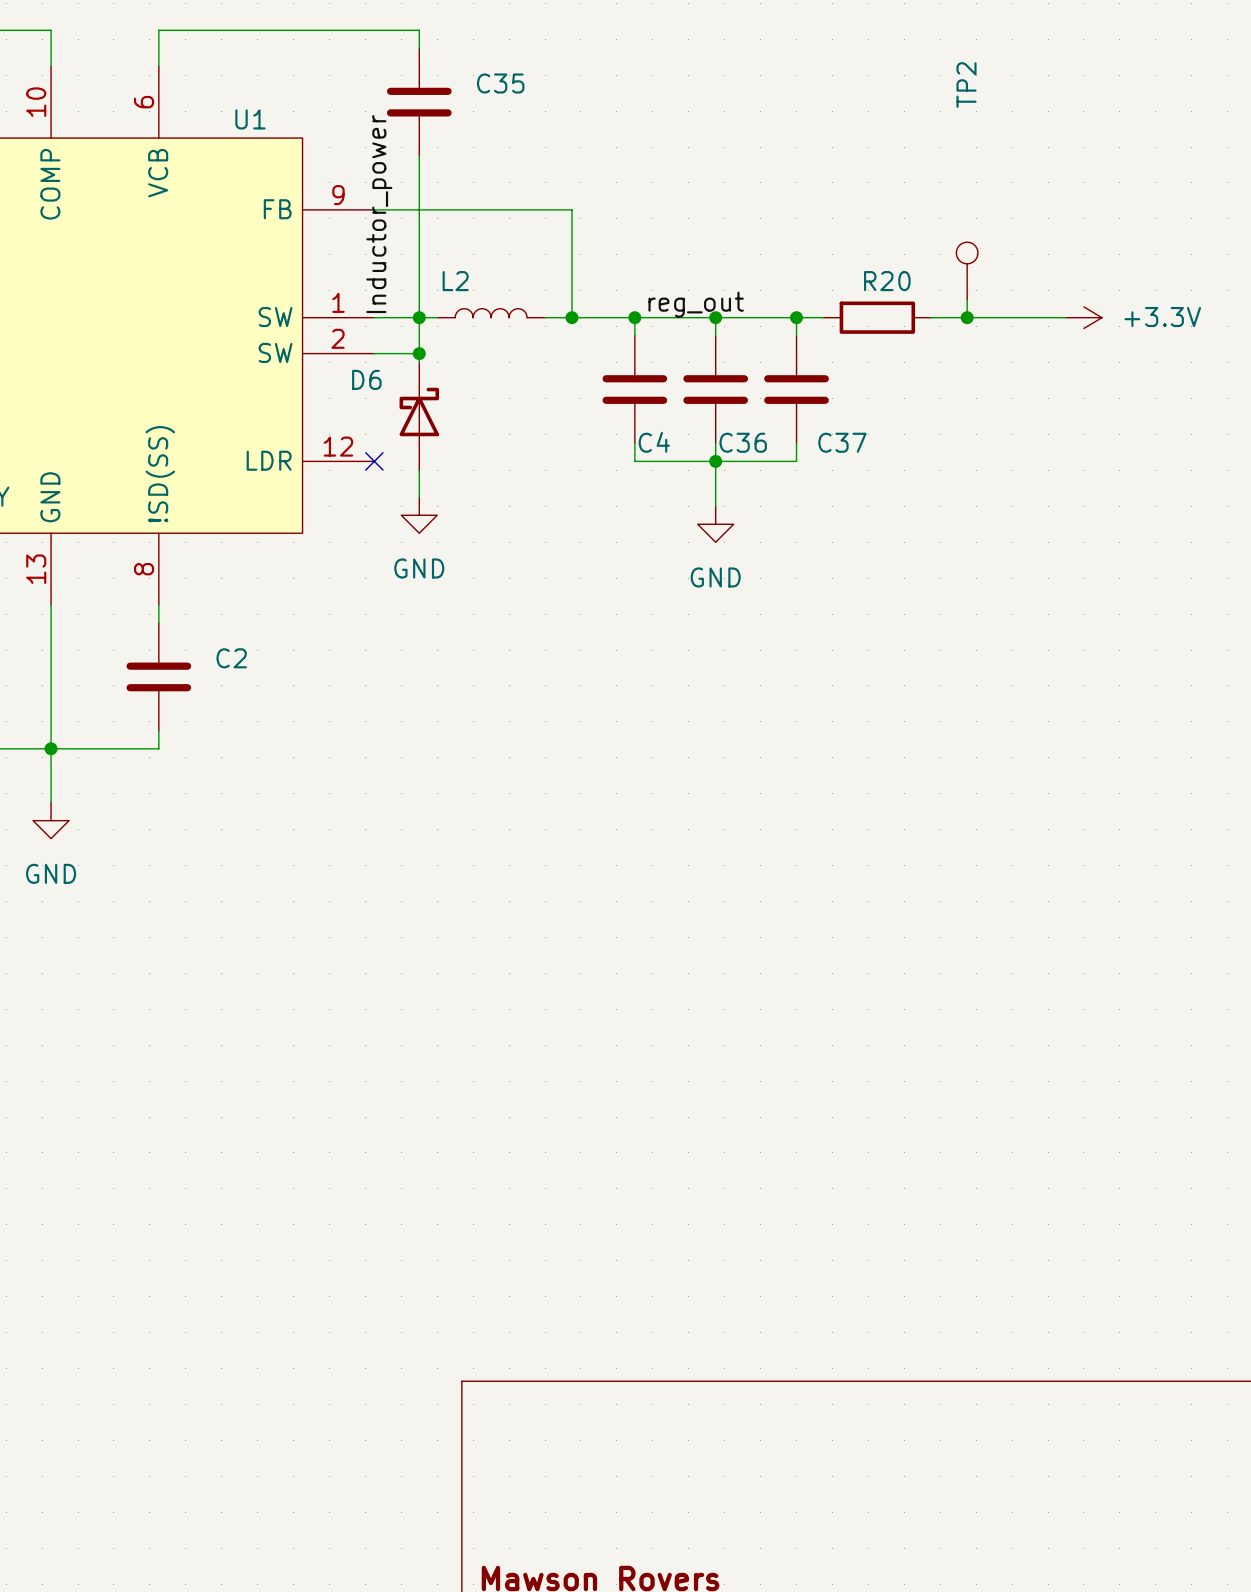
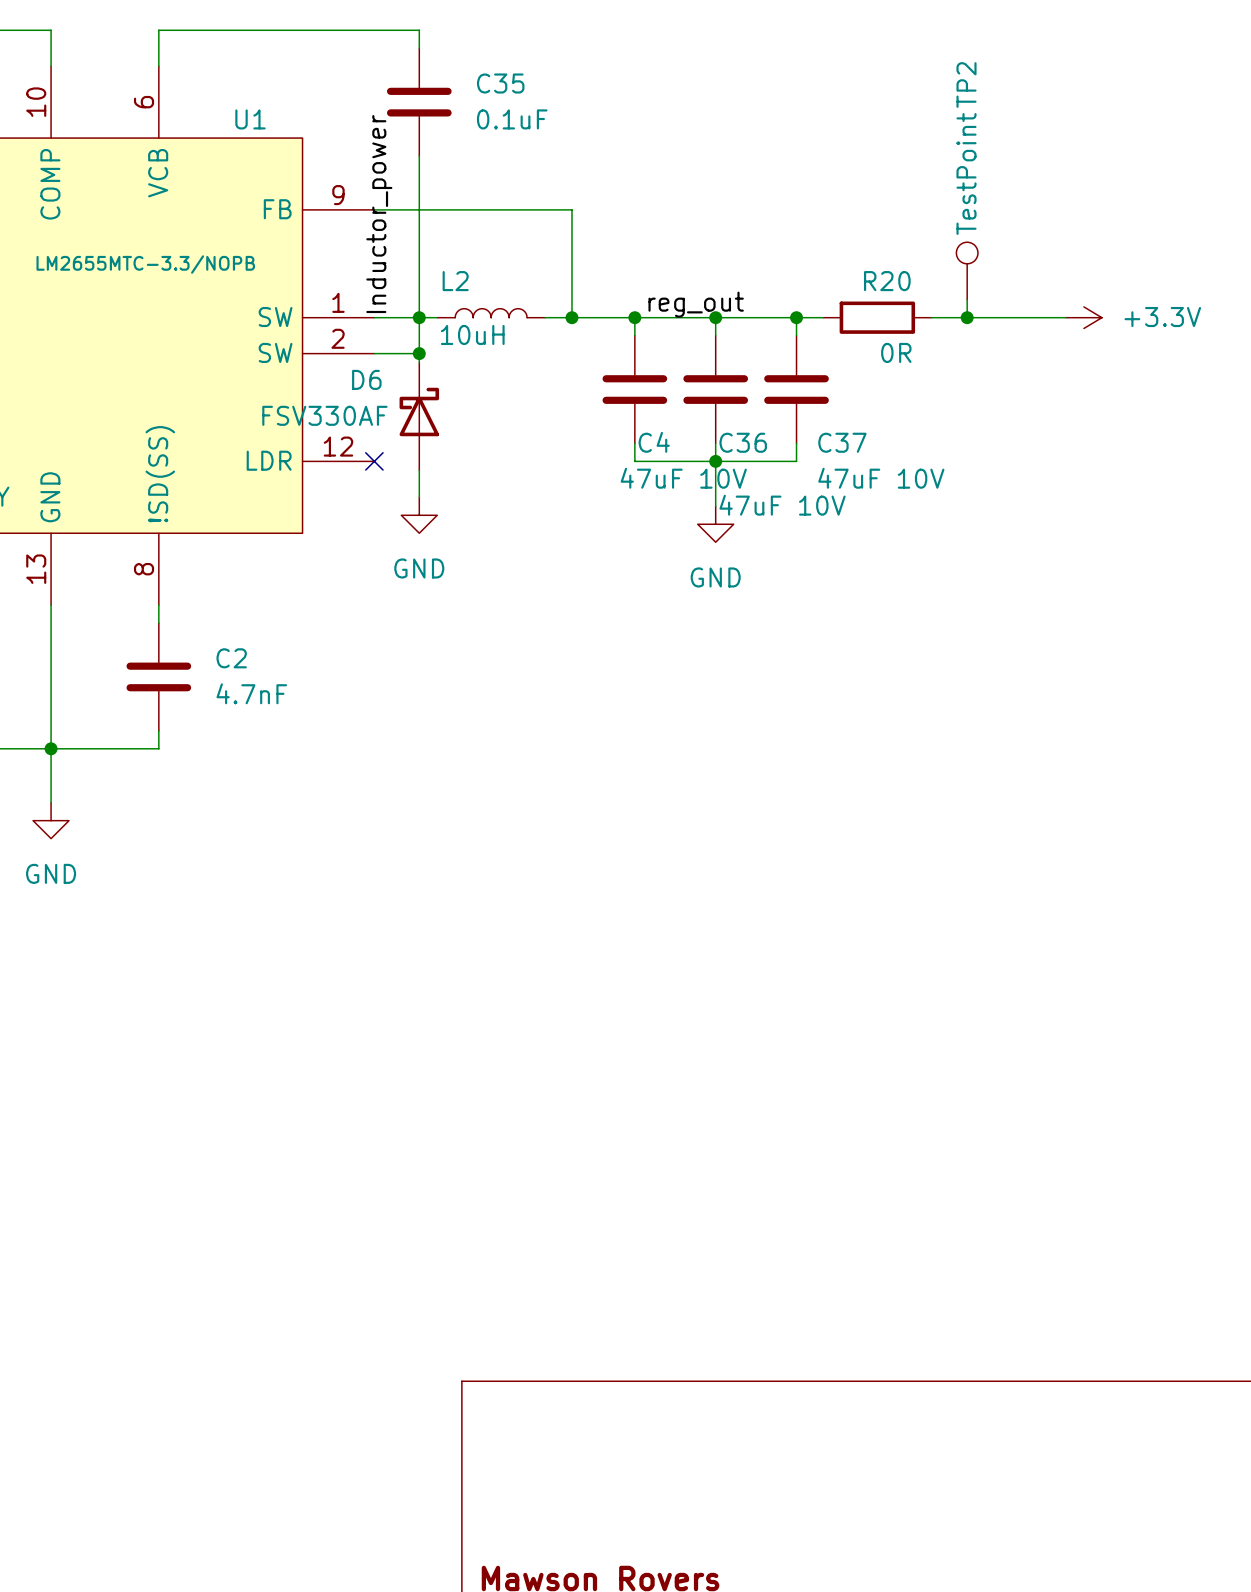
C35 value: none -> 0.1uF (512, 119)
TP2 value: none -> TestPoint (966, 173)
U1 value: none -> LM2655MTC-3.3/NOPB (145, 264)
L2 value: none -> 10uH (472, 334)
R20 value: none -> 0R (896, 352)
D6 value: none -> FSV330AF (324, 415)
C4 value: none -> 47uF 10V (683, 478)
C37 value: none -> 47uF 10V (881, 478)
C36 value: none -> 47uF 10V (782, 505)
C2 value: none -> 4.7nF (251, 693)

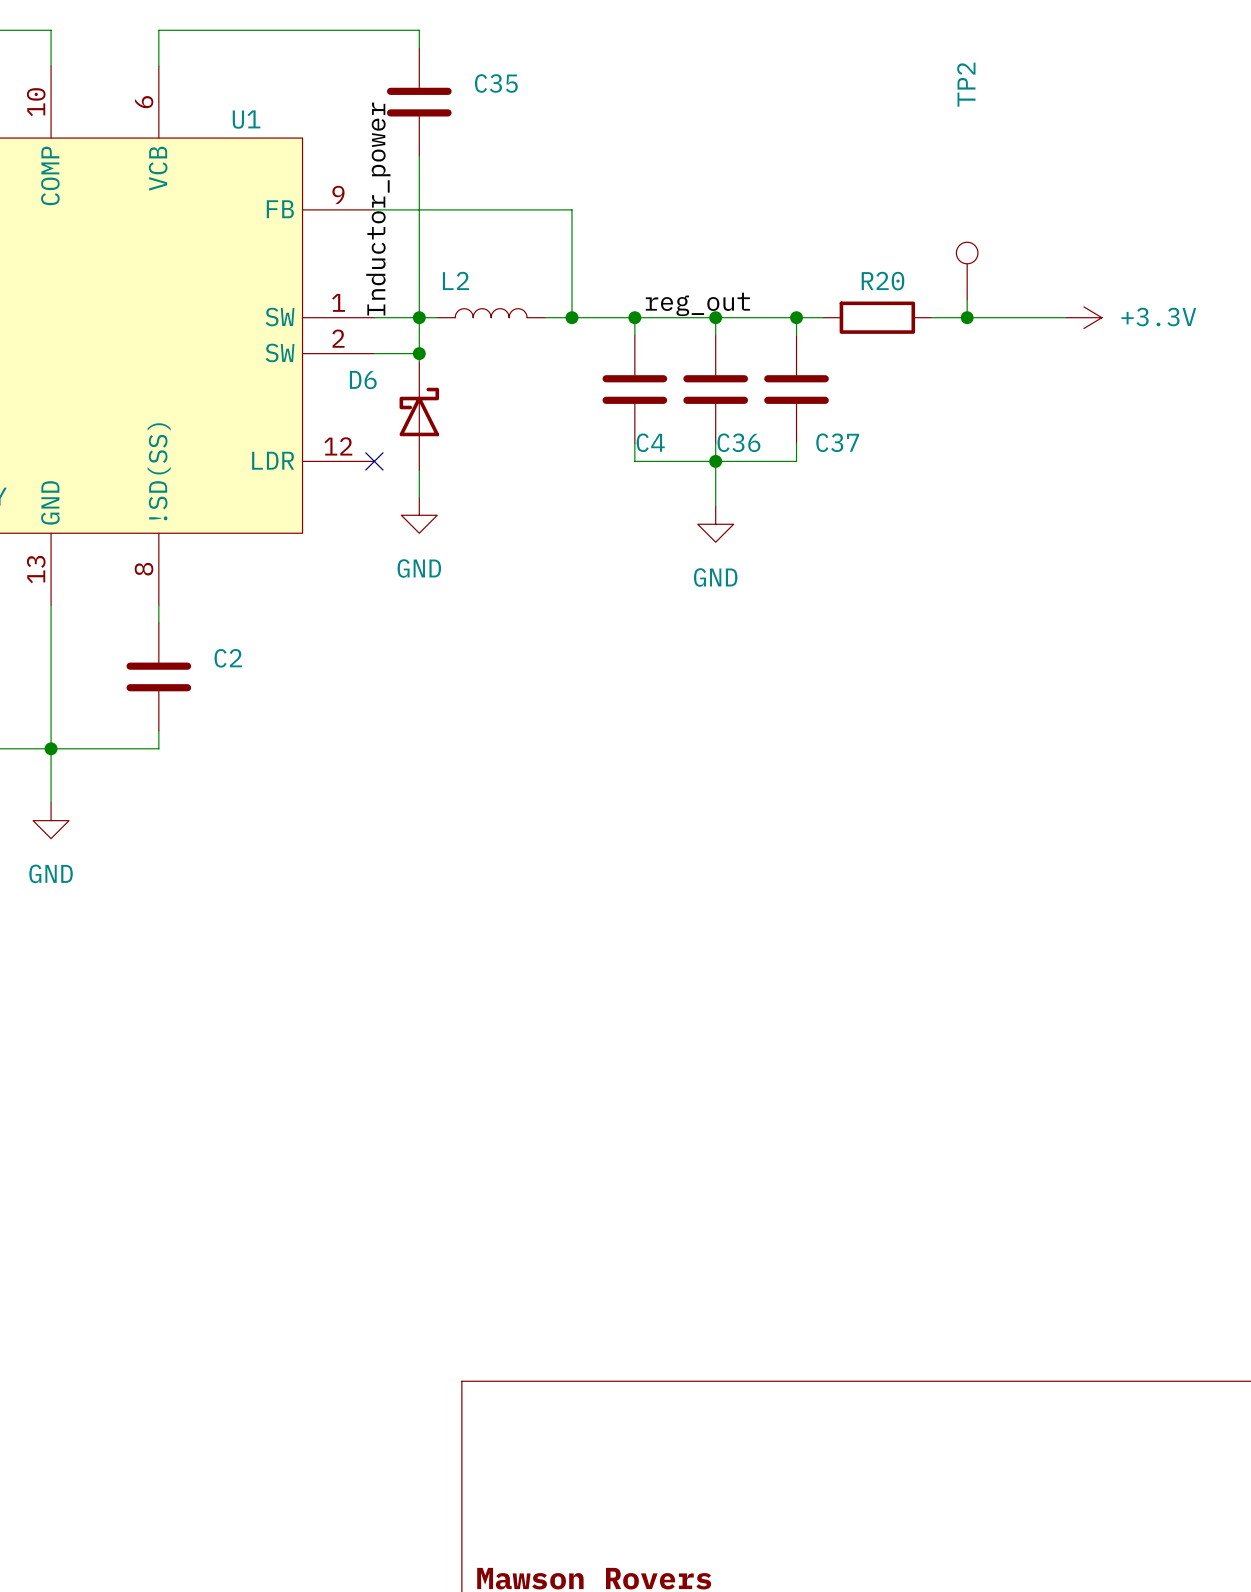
C35 value: 0.1uF (512, 119) -> none
TP2 value: TestPoint (966, 173) -> none
U1 value: LM2655MTC-3.3/NOPB (145, 264) -> none
L2 value: 10uH (472, 334) -> none
R20 value: 0R (896, 352) -> none
D6 value: FSV330AF (324, 415) -> none
C4 value: 47uF 10V (683, 478) -> none
C37 value: 47uF 10V (881, 478) -> none
C36 value: 47uF 10V (782, 505) -> none
C2 value: 4.7nF (251, 693) -> none

